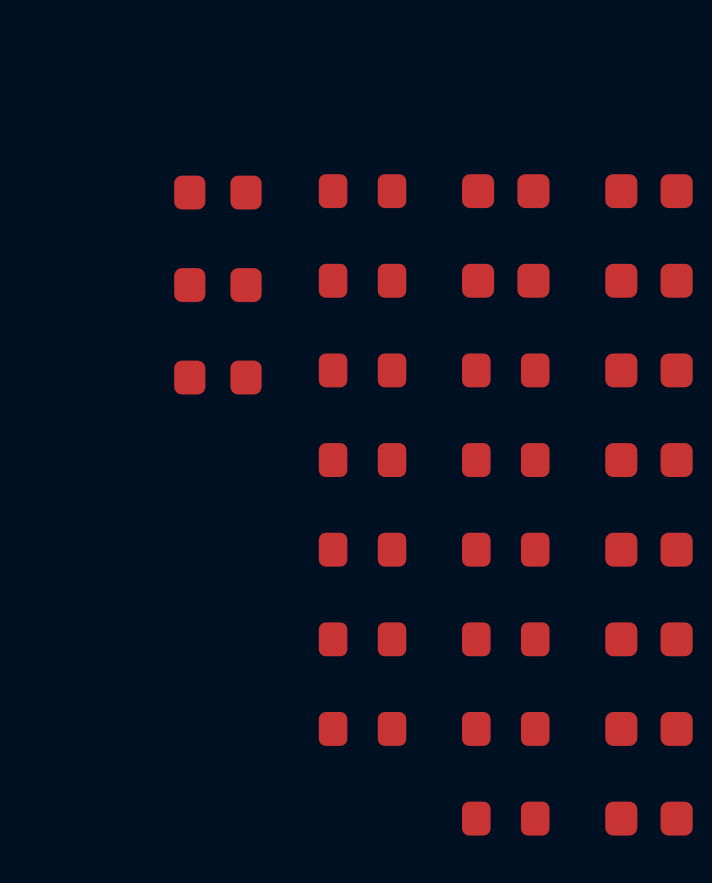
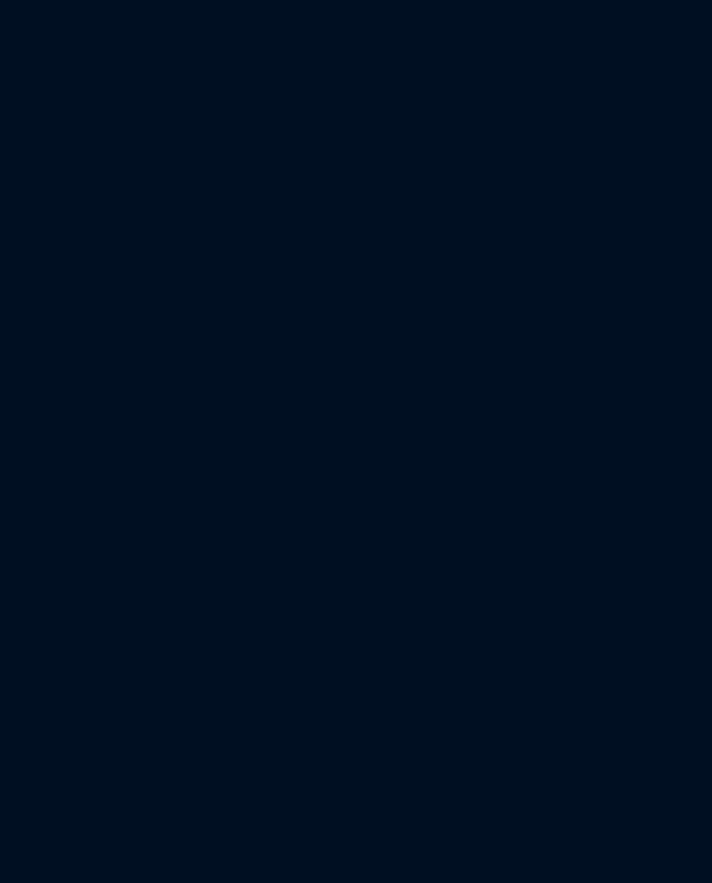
part: (362, 191) -> none
part: (505, 191) -> none
part: (648, 191) -> none
part: (217, 192) -> none
part: (362, 280) -> none
part: (505, 280) -> none
part: (648, 280) -> none
part: (217, 285) -> none
part: (362, 370) -> none
part: (505, 370) -> none
part: (648, 370) -> none
part: (217, 377) -> none
part: (362, 460) -> none
part: (505, 460) -> none
part: (648, 460) -> none
part: (362, 549) -> none
part: (505, 549) -> none
part: (648, 549) -> none
part: (362, 639) -> none
part: (505, 639) -> none
part: (648, 639) -> none
part: (362, 728) -> none
part: (505, 728) -> none
part: (648, 728) -> none
part: (505, 818) -> none
part: (648, 818) -> none

